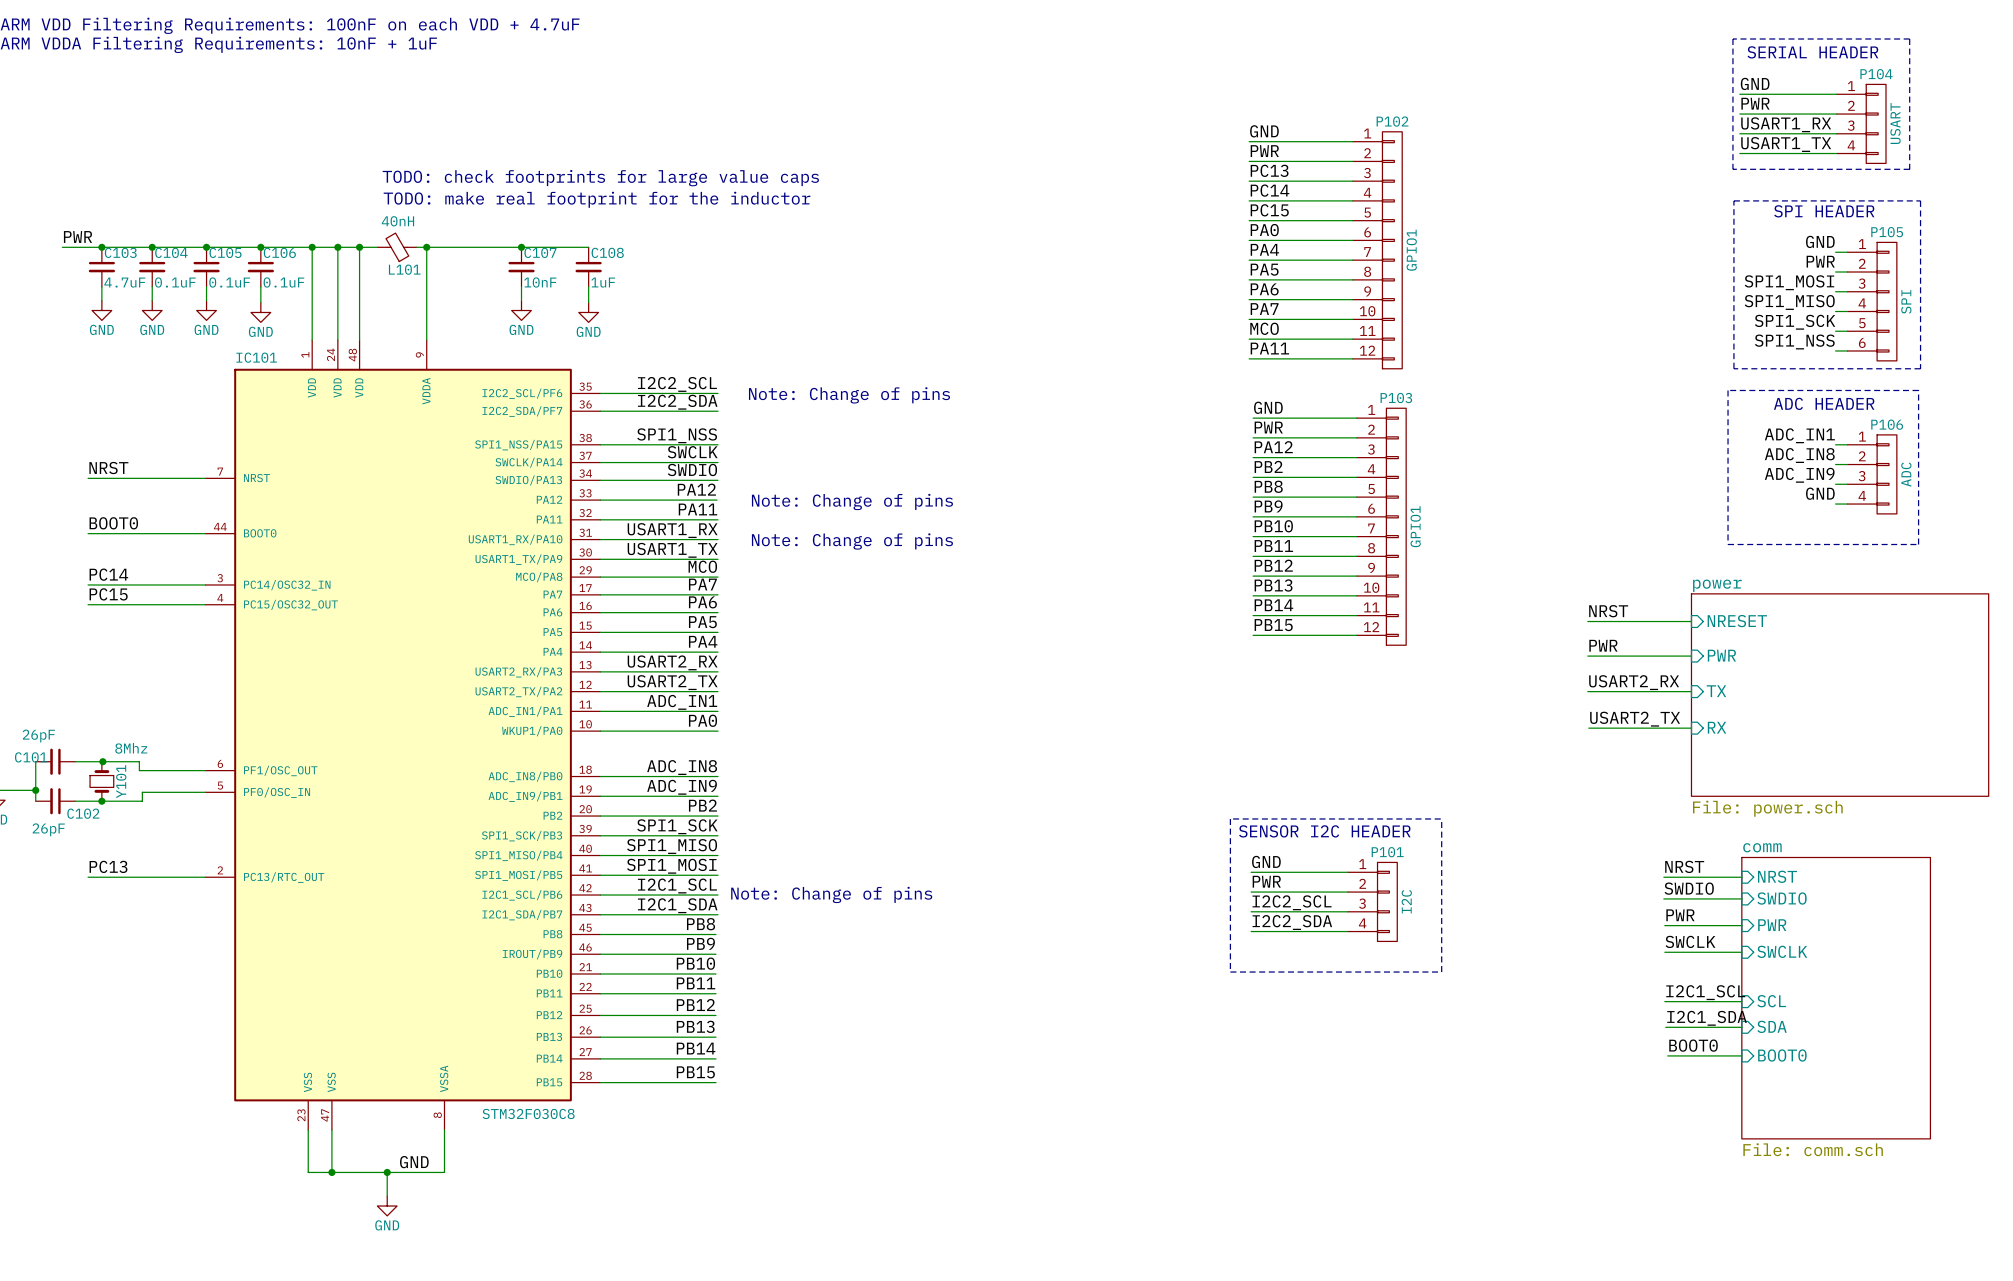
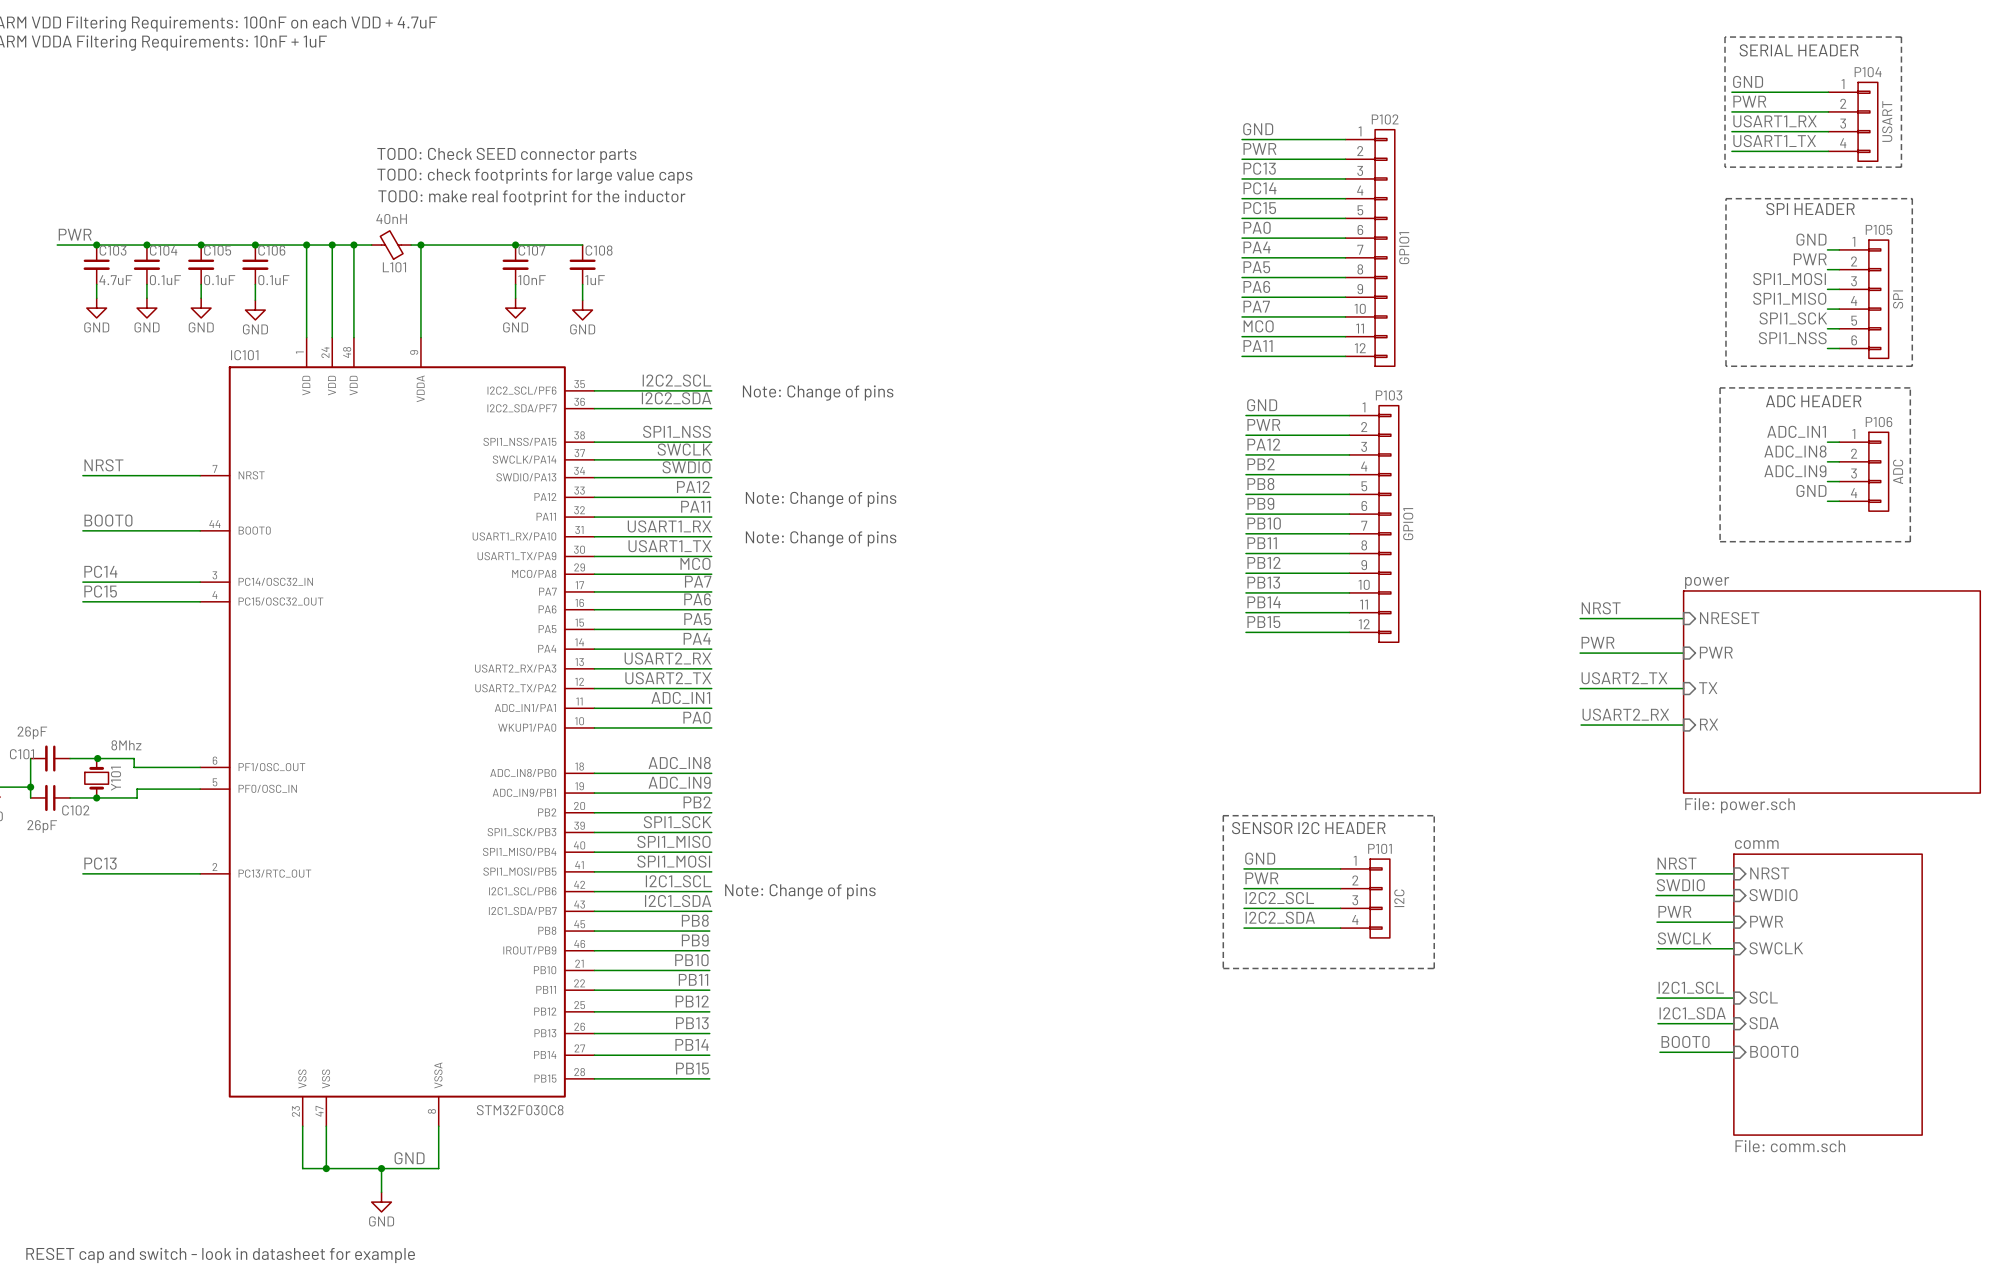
text: none -> TODO: Check SEED connector parts (506, 155)
label: USART2_RX (1634, 682) -> USART2_TX (1624, 678)
label: USART2_TX (1635, 719) -> USART2_RX (1625, 714)
text: none -> RESET cap and switch - look in datasheet for example (220, 1255)

